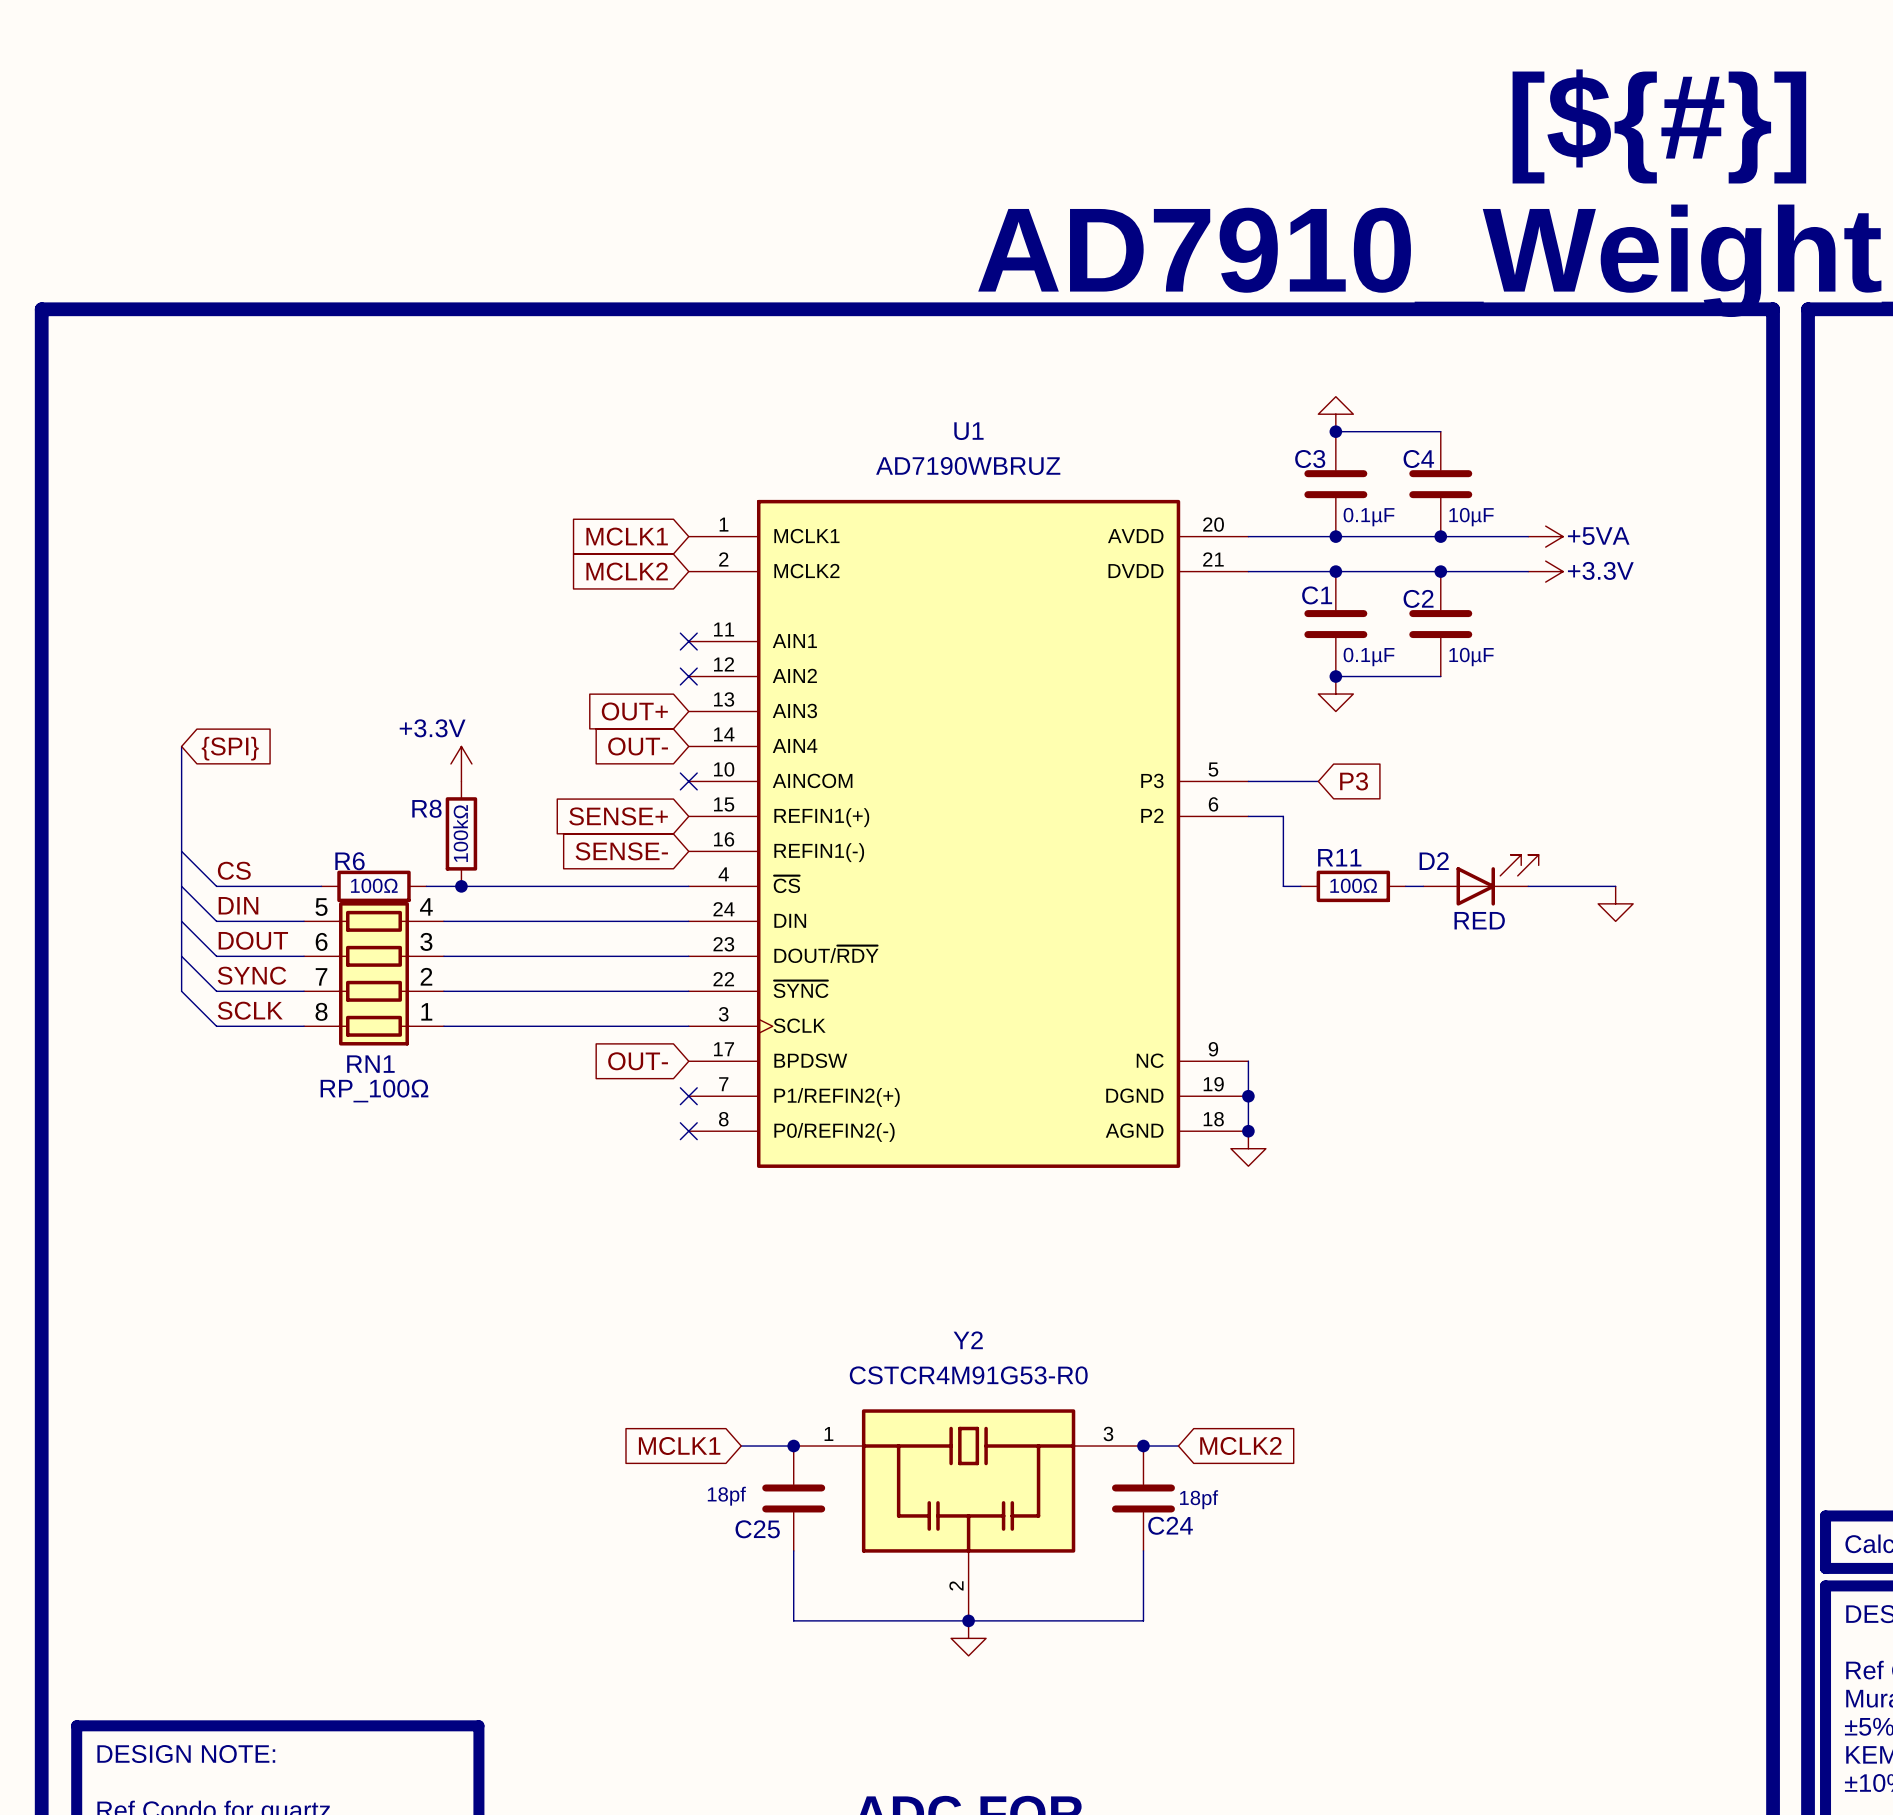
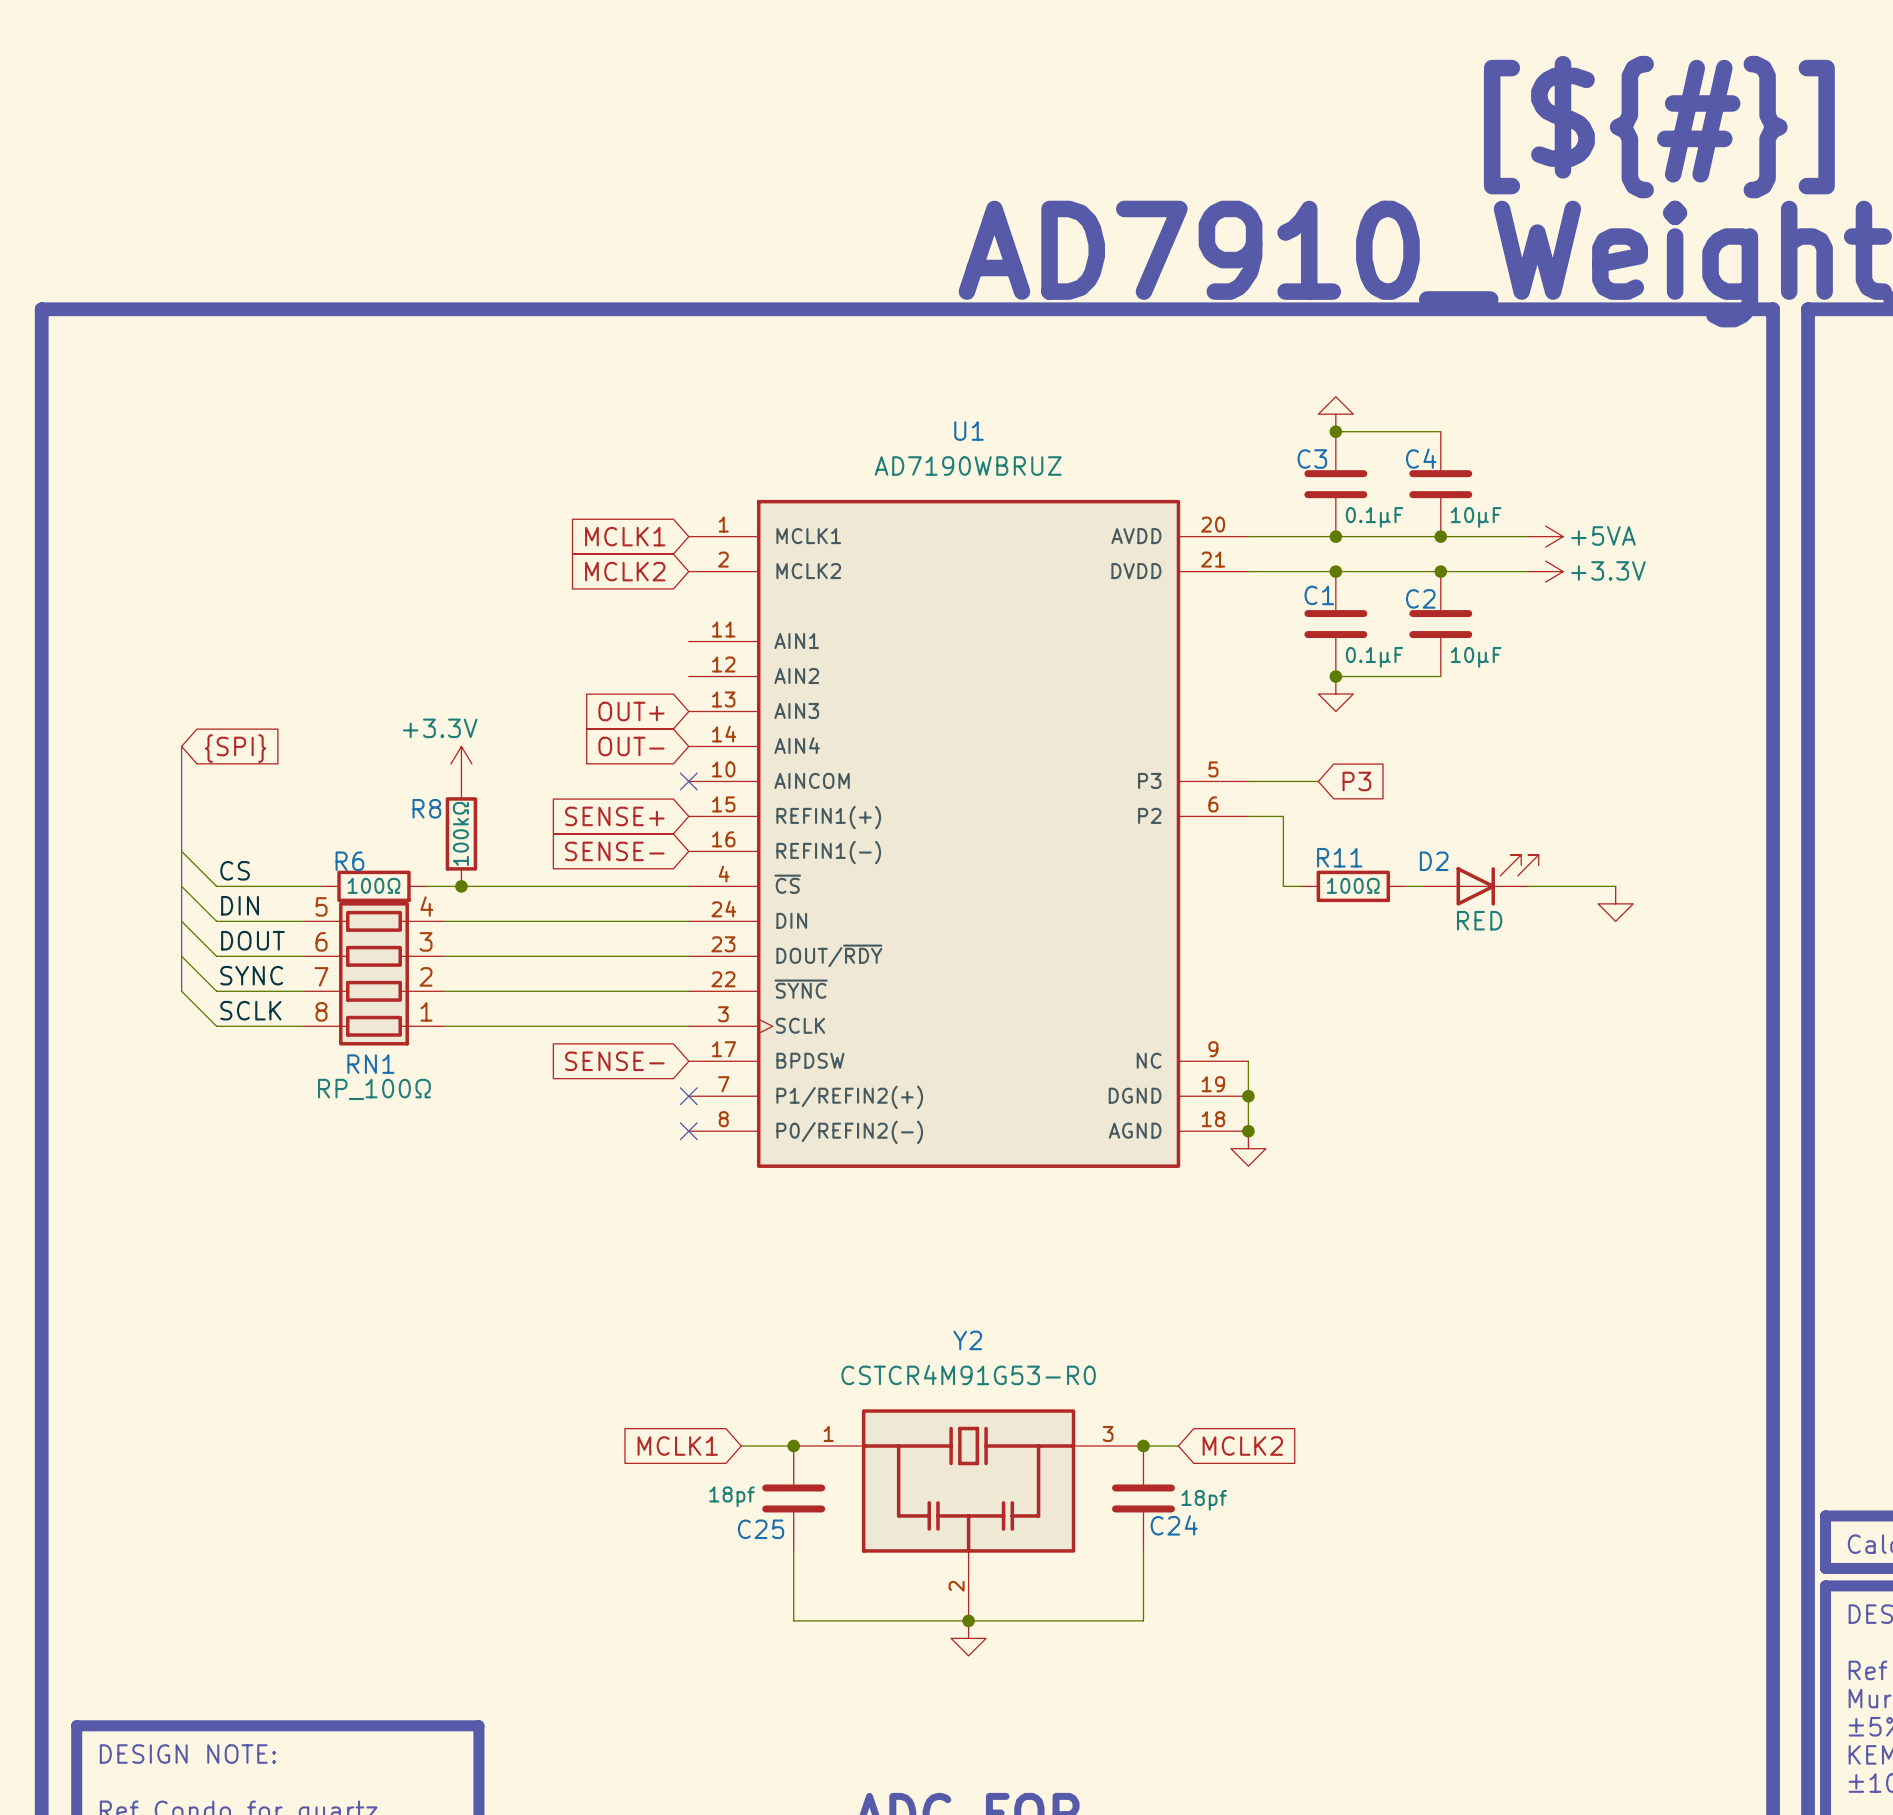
no-connect mark: (688, 641) -> none
no-connect mark: (688, 676) -> none
global label: OUT- (638, 1061) -> SENSE- (614, 1061)

